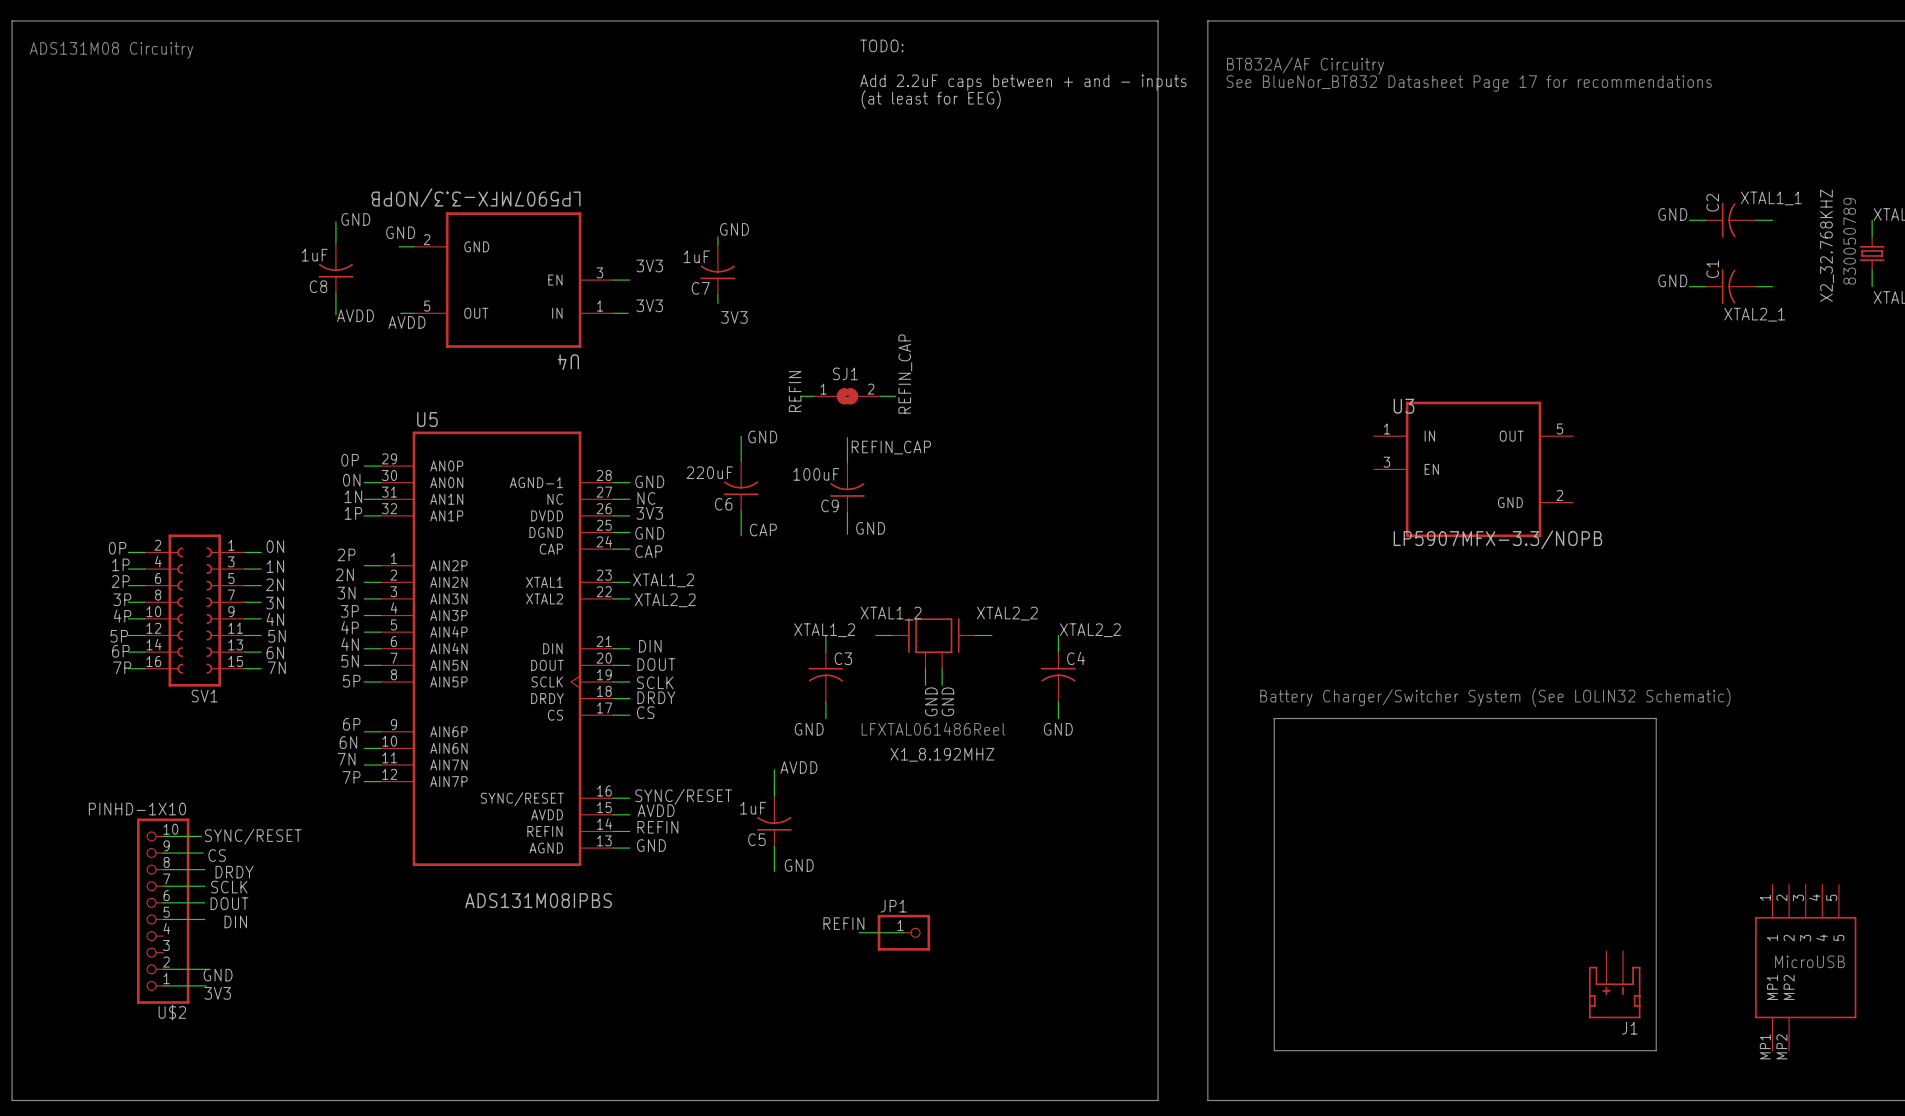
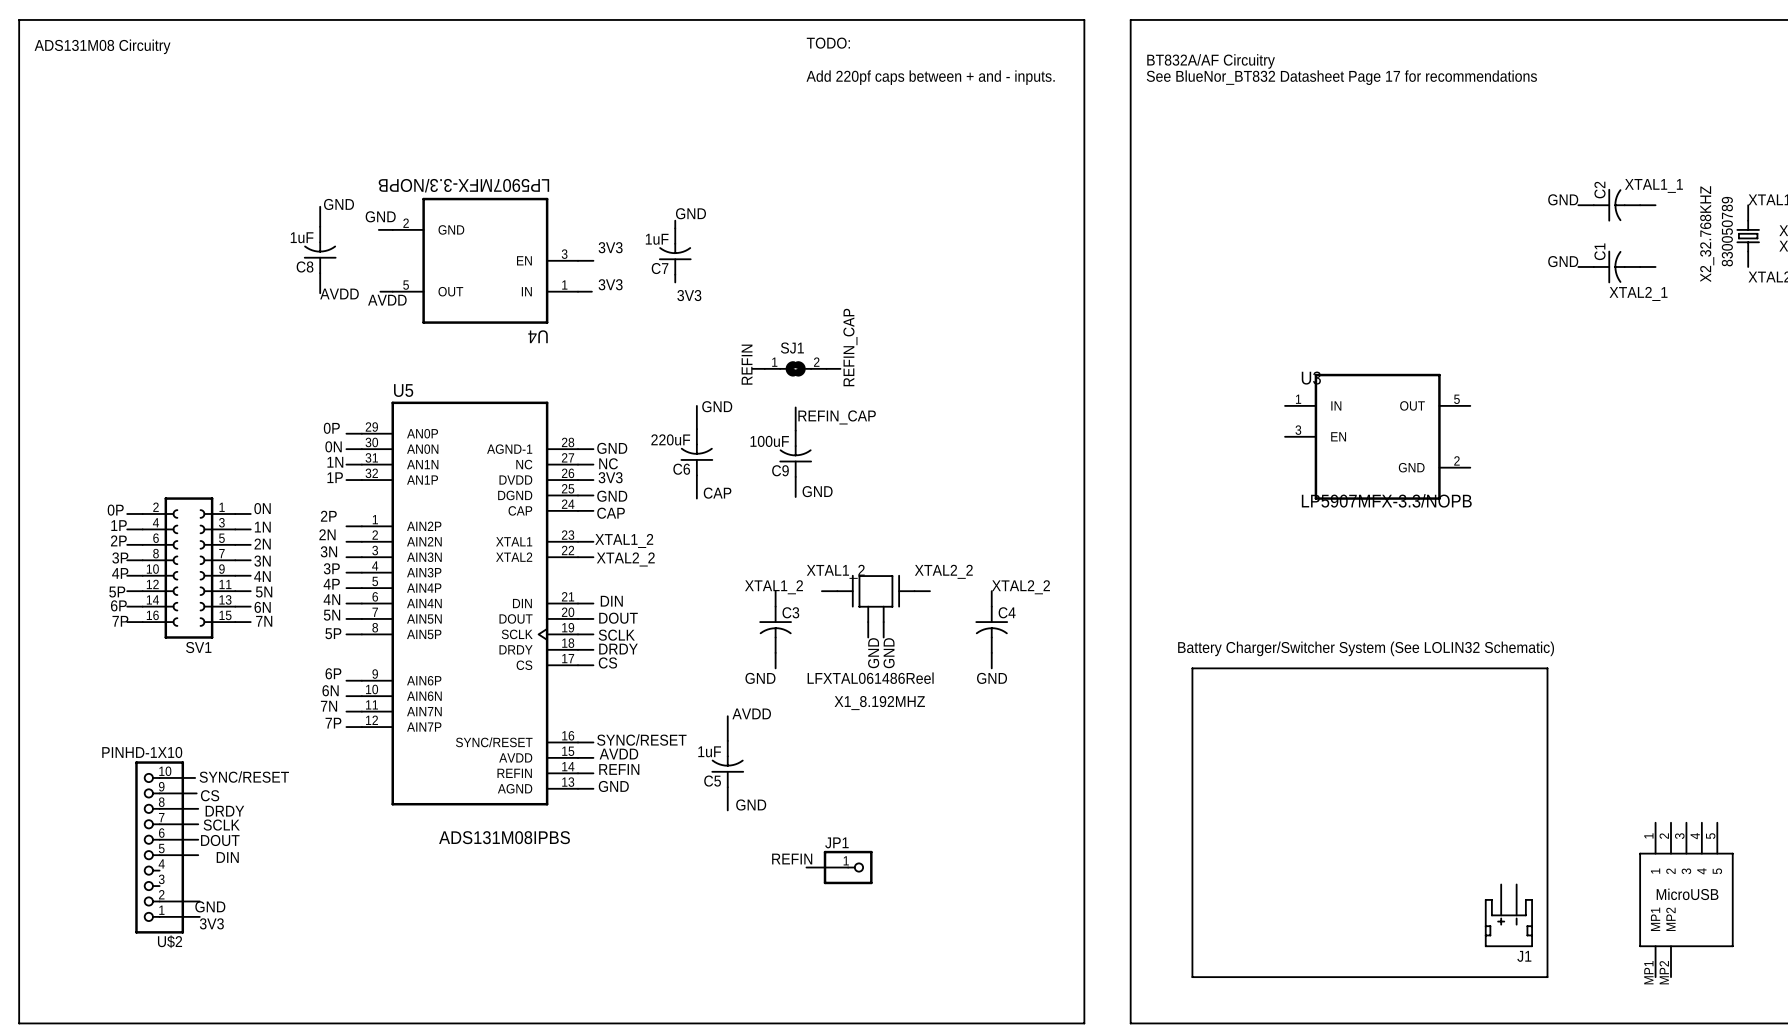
text: Add 2.2uF caps between + and - inputs (1023, 82) -> Add 220pf caps between + and - inputs. (930, 77)
text: (at least for EEG) (931, 99) -> none

